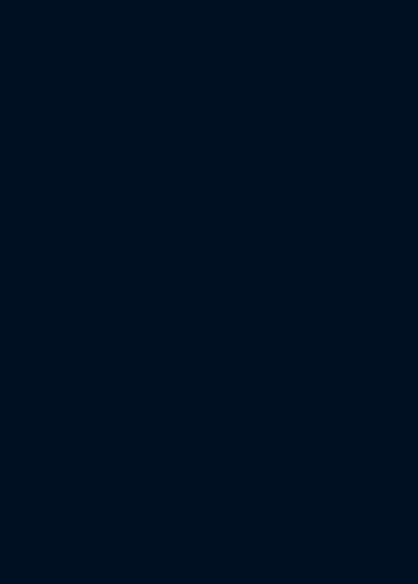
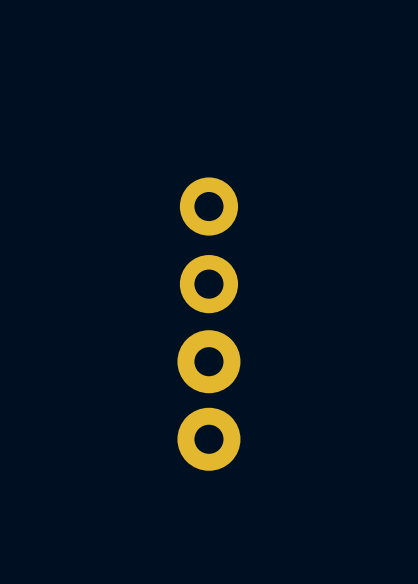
part: none -> (208, 324)

